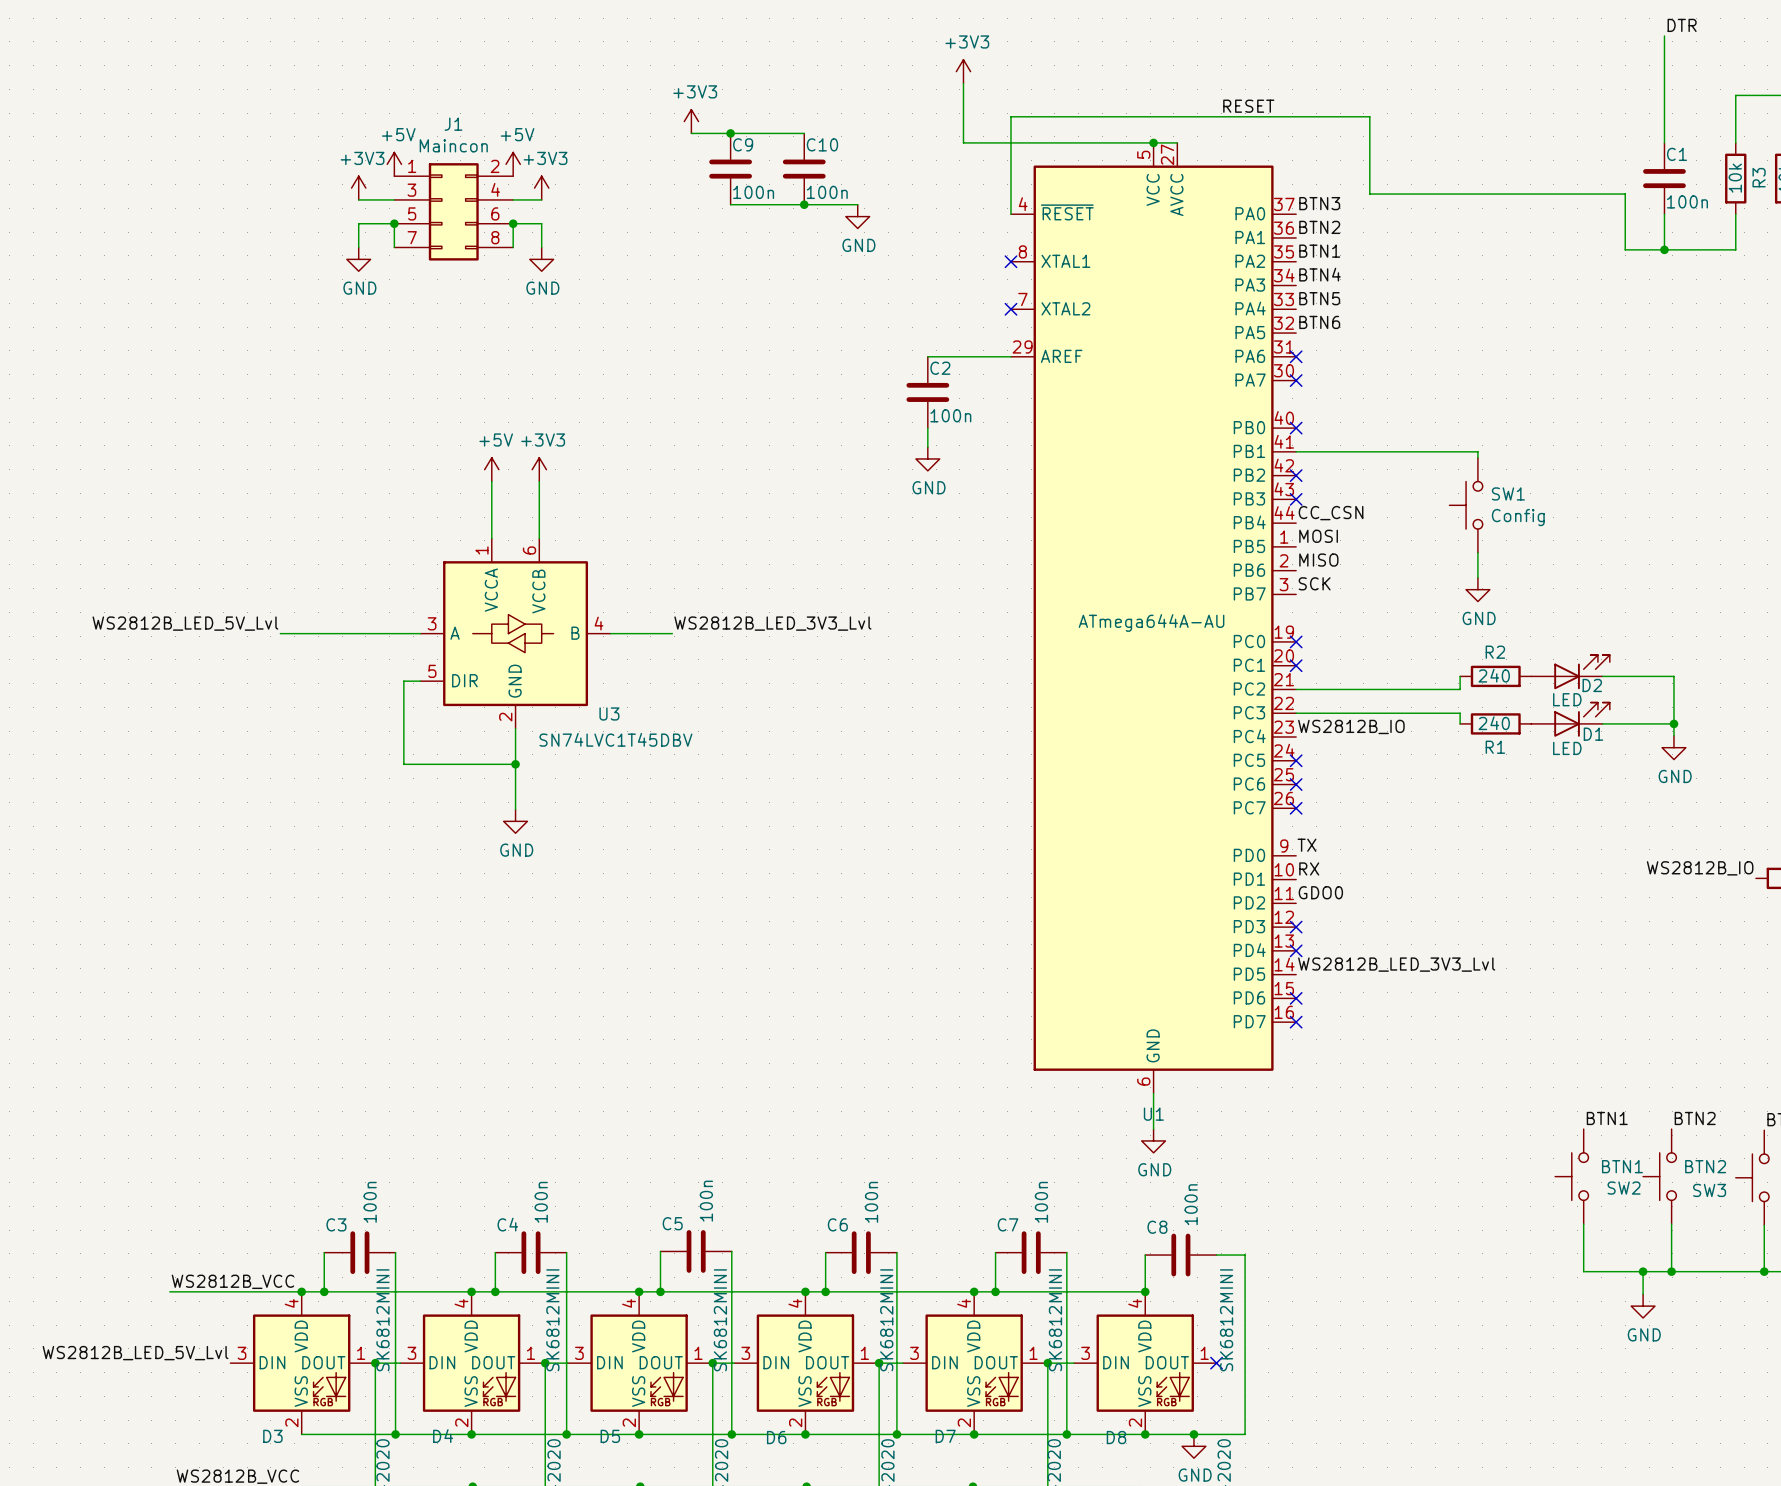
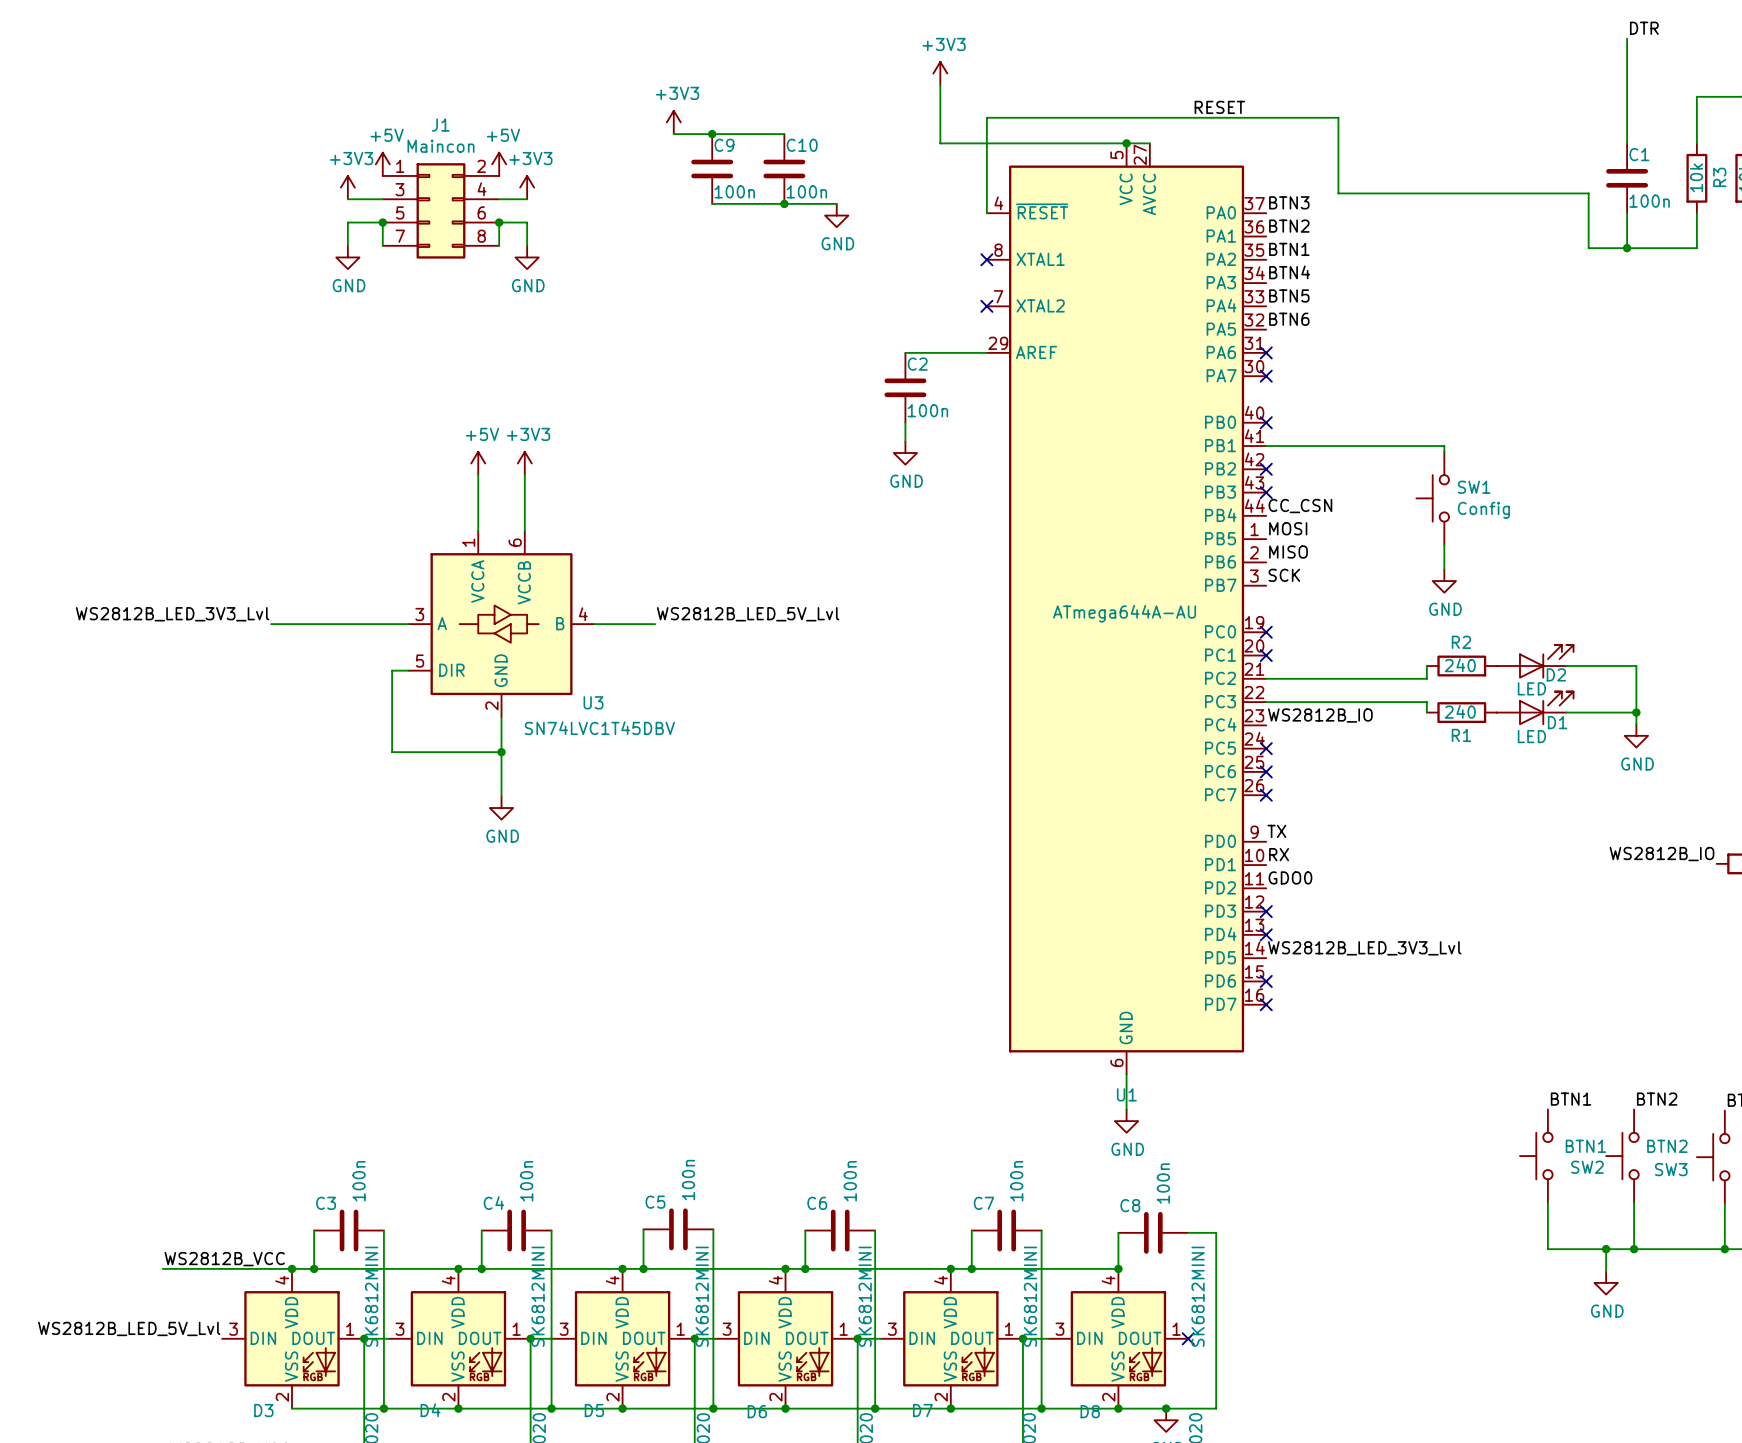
label: WS2812B_LED_5V_Lvl (185, 623) -> WS2812B_LED_3V3_Lvl (172, 614)
label: WS2812B_LED_3V3_Lvl (772, 623) -> WS2812B_LED_5V_Lvl (748, 614)

